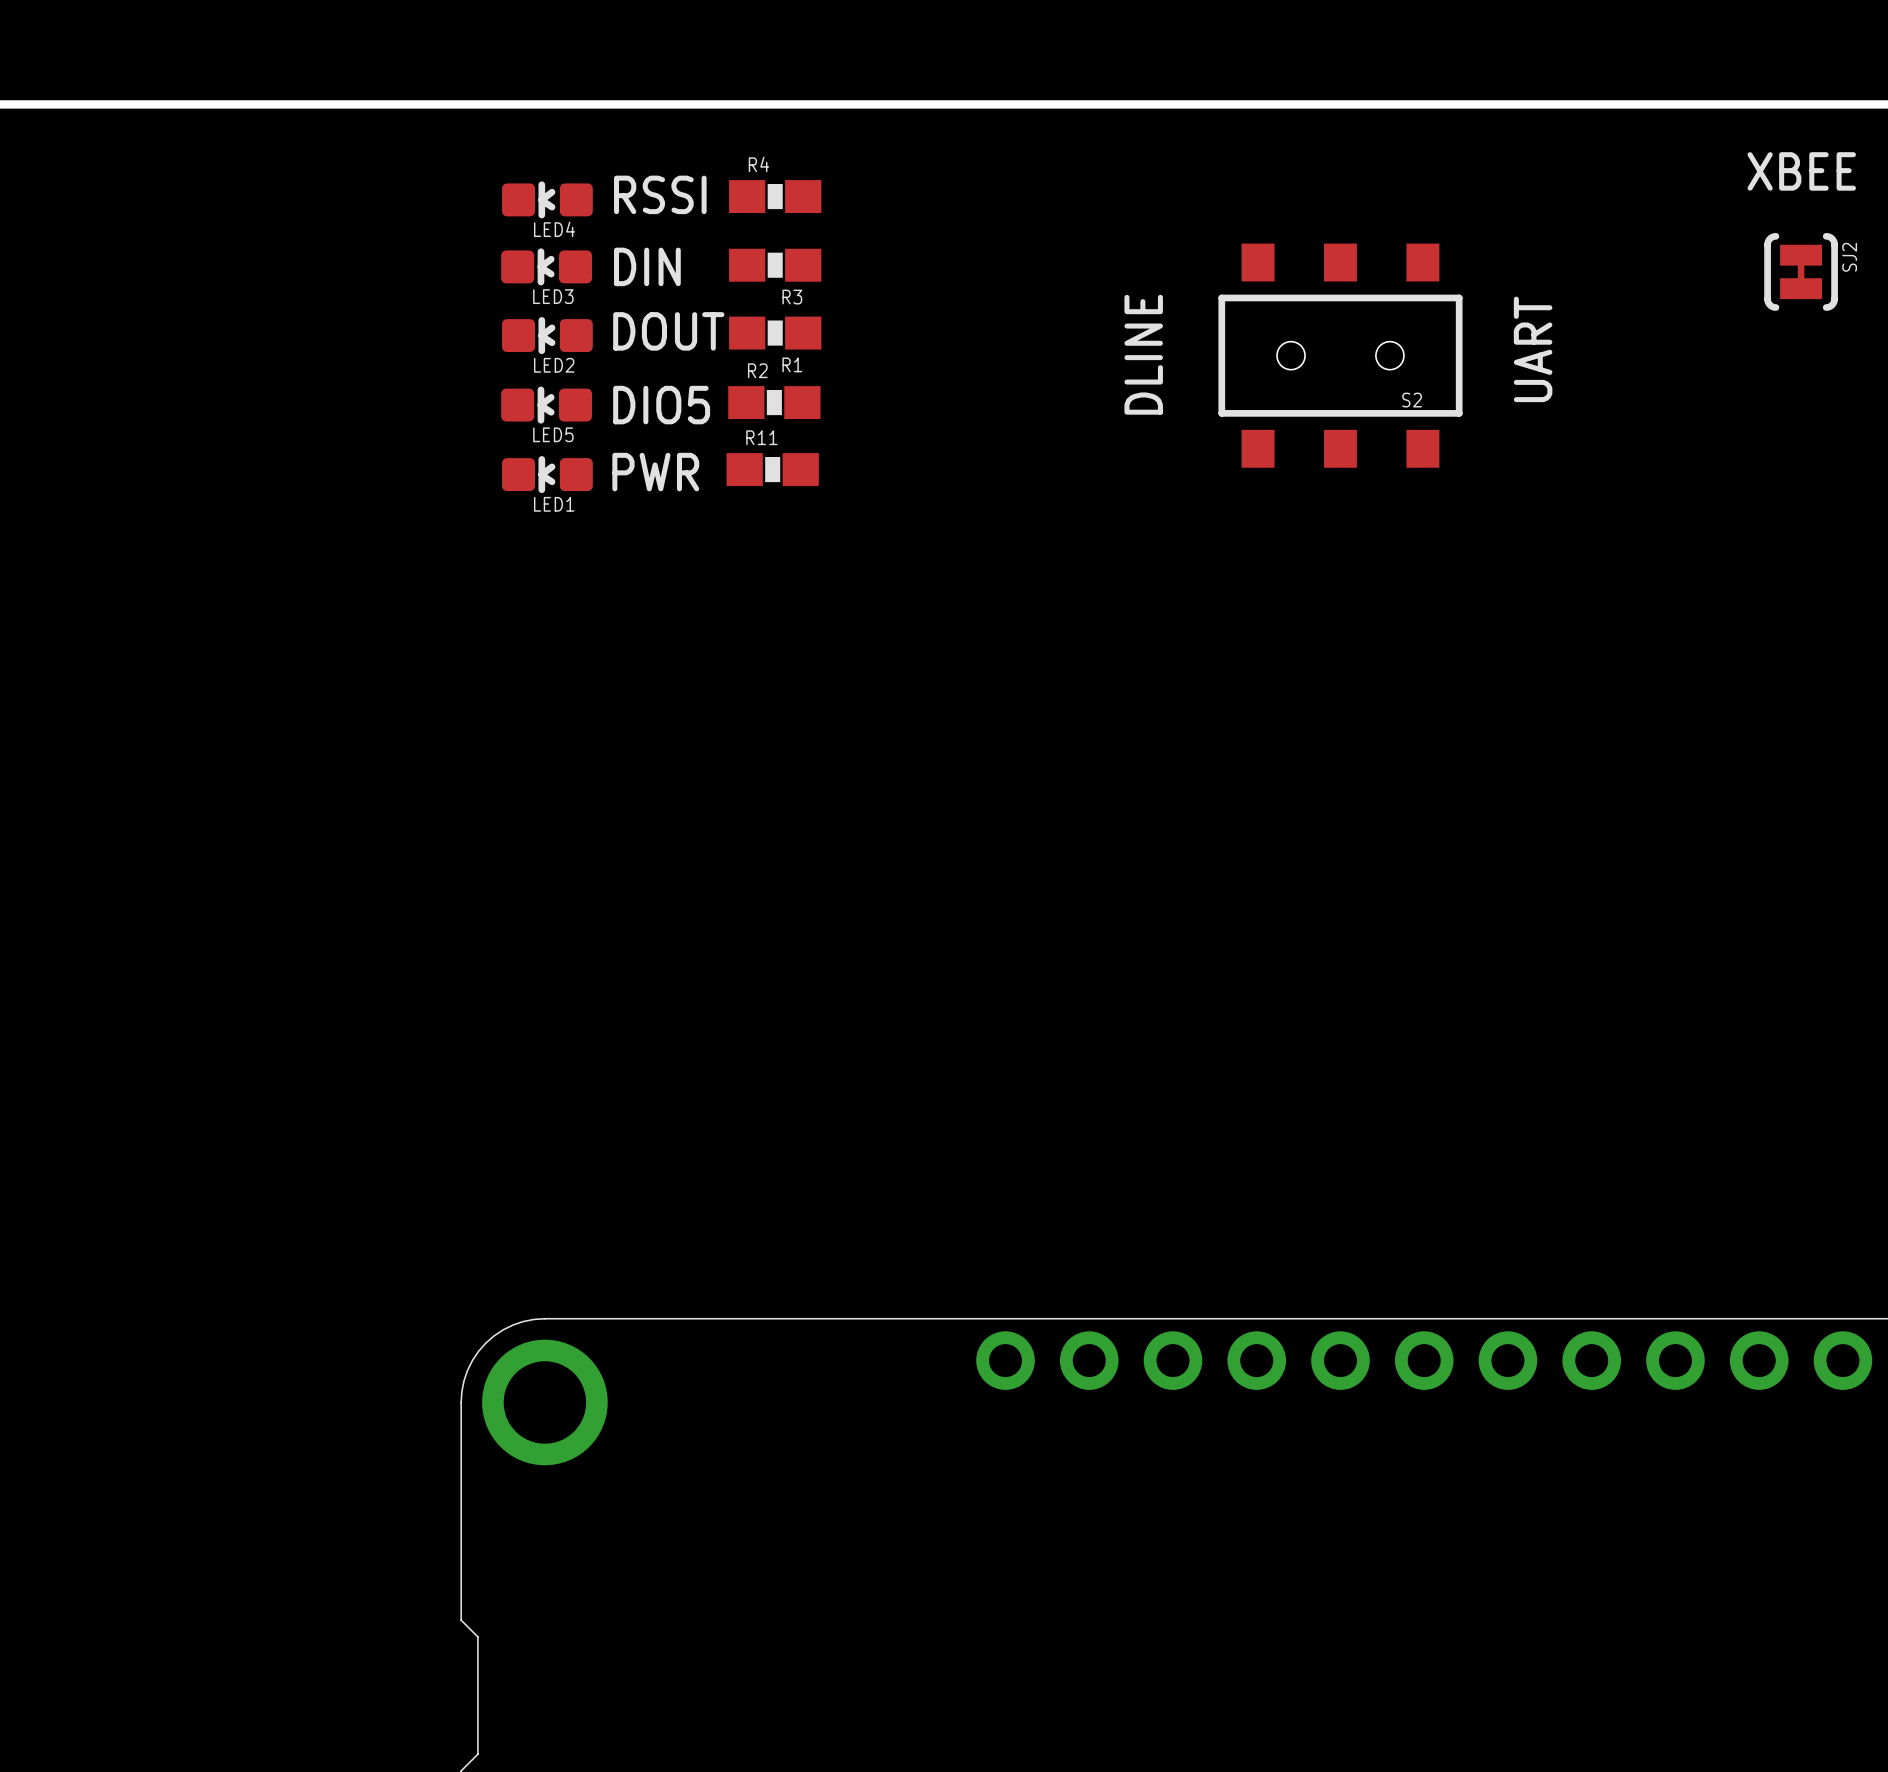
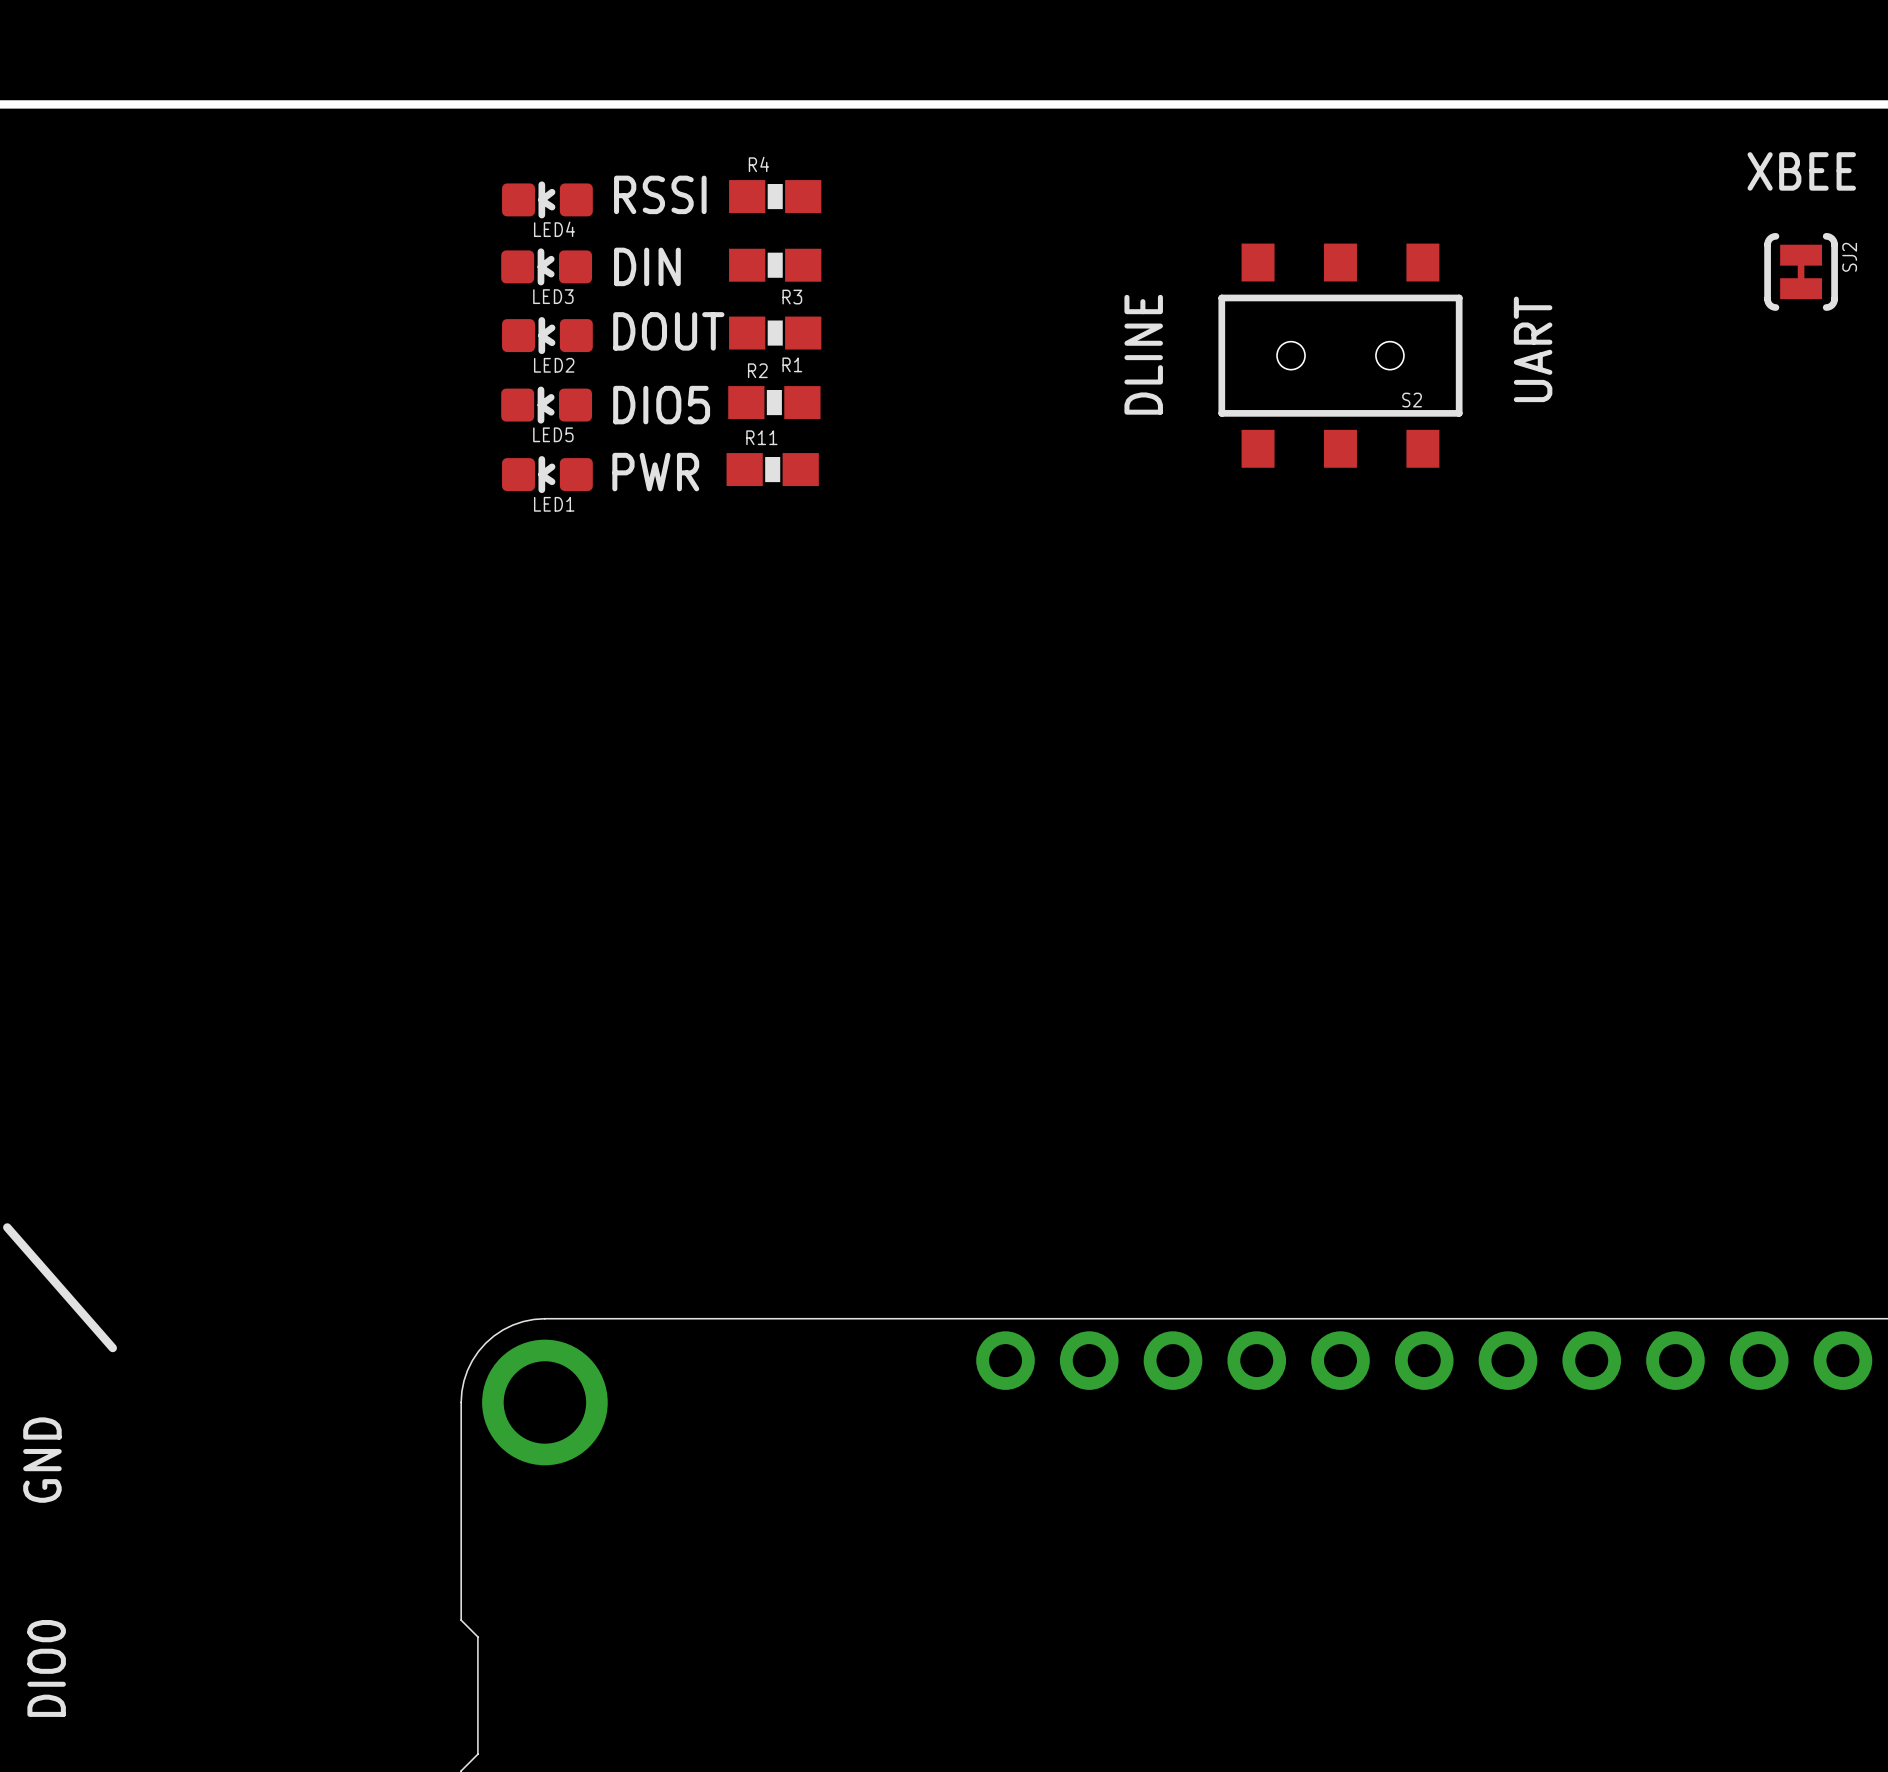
line: none -> (7, 1227) (112, 1348)
text: none -> GND (42, 1460)
text: none -> DIO0 (46, 1668)

